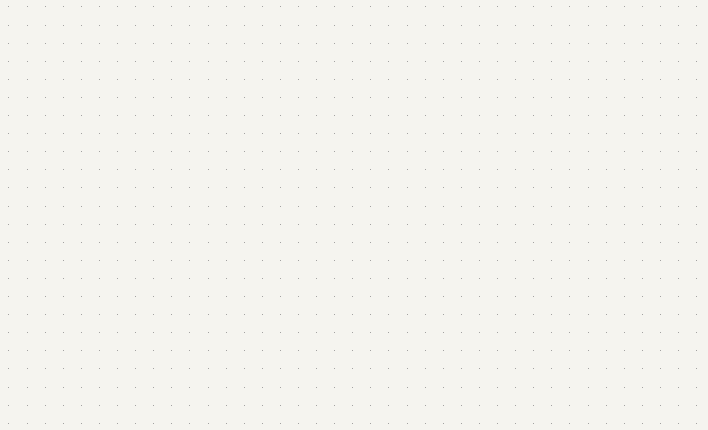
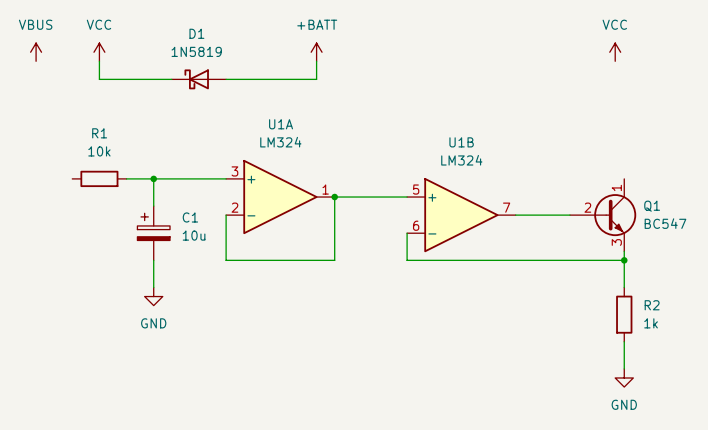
power symbol: none -> VBUS (36, 52)
power symbol: none -> VCC (99, 52)
power symbol: none -> +BATT (316, 52)
power symbol: none -> VCC (615, 52)
wire: none -> (99, 61) (99, 79) (171, 79)
wire: none -> (316, 61) (316, 79) (226, 79)
D1: none -> 1N5819 (198, 79)
R1: none -> 10k (99, 178)
wire: none -> (126, 178) (226, 178)
wire: none -> (153, 178) (153, 206)
junction: none -> (153, 178)
U1A: none -> LM324 (280, 197)
junction: none -> (334, 197)
wire: none -> (407, 197) (334, 197) (334, 260) (226, 260) (226, 215)
U1B: none -> LM324 (461, 215)
wire: none -> (515, 215) (569, 215)
Q1: none -> BC547 (603, 215)
C1: none -> 10u (153, 233)
wire: none -> (407, 233) (407, 260) (624, 260)
wire: none -> (624, 251) (624, 287)
wire: none -> (153, 260) (153, 287)
junction: none -> (624, 260)
power symbol: none -> GND (153, 296)
R2: none -> 1k (624, 314)
wire: none -> (624, 341) (624, 368)
power symbol: none -> GND (624, 377)

